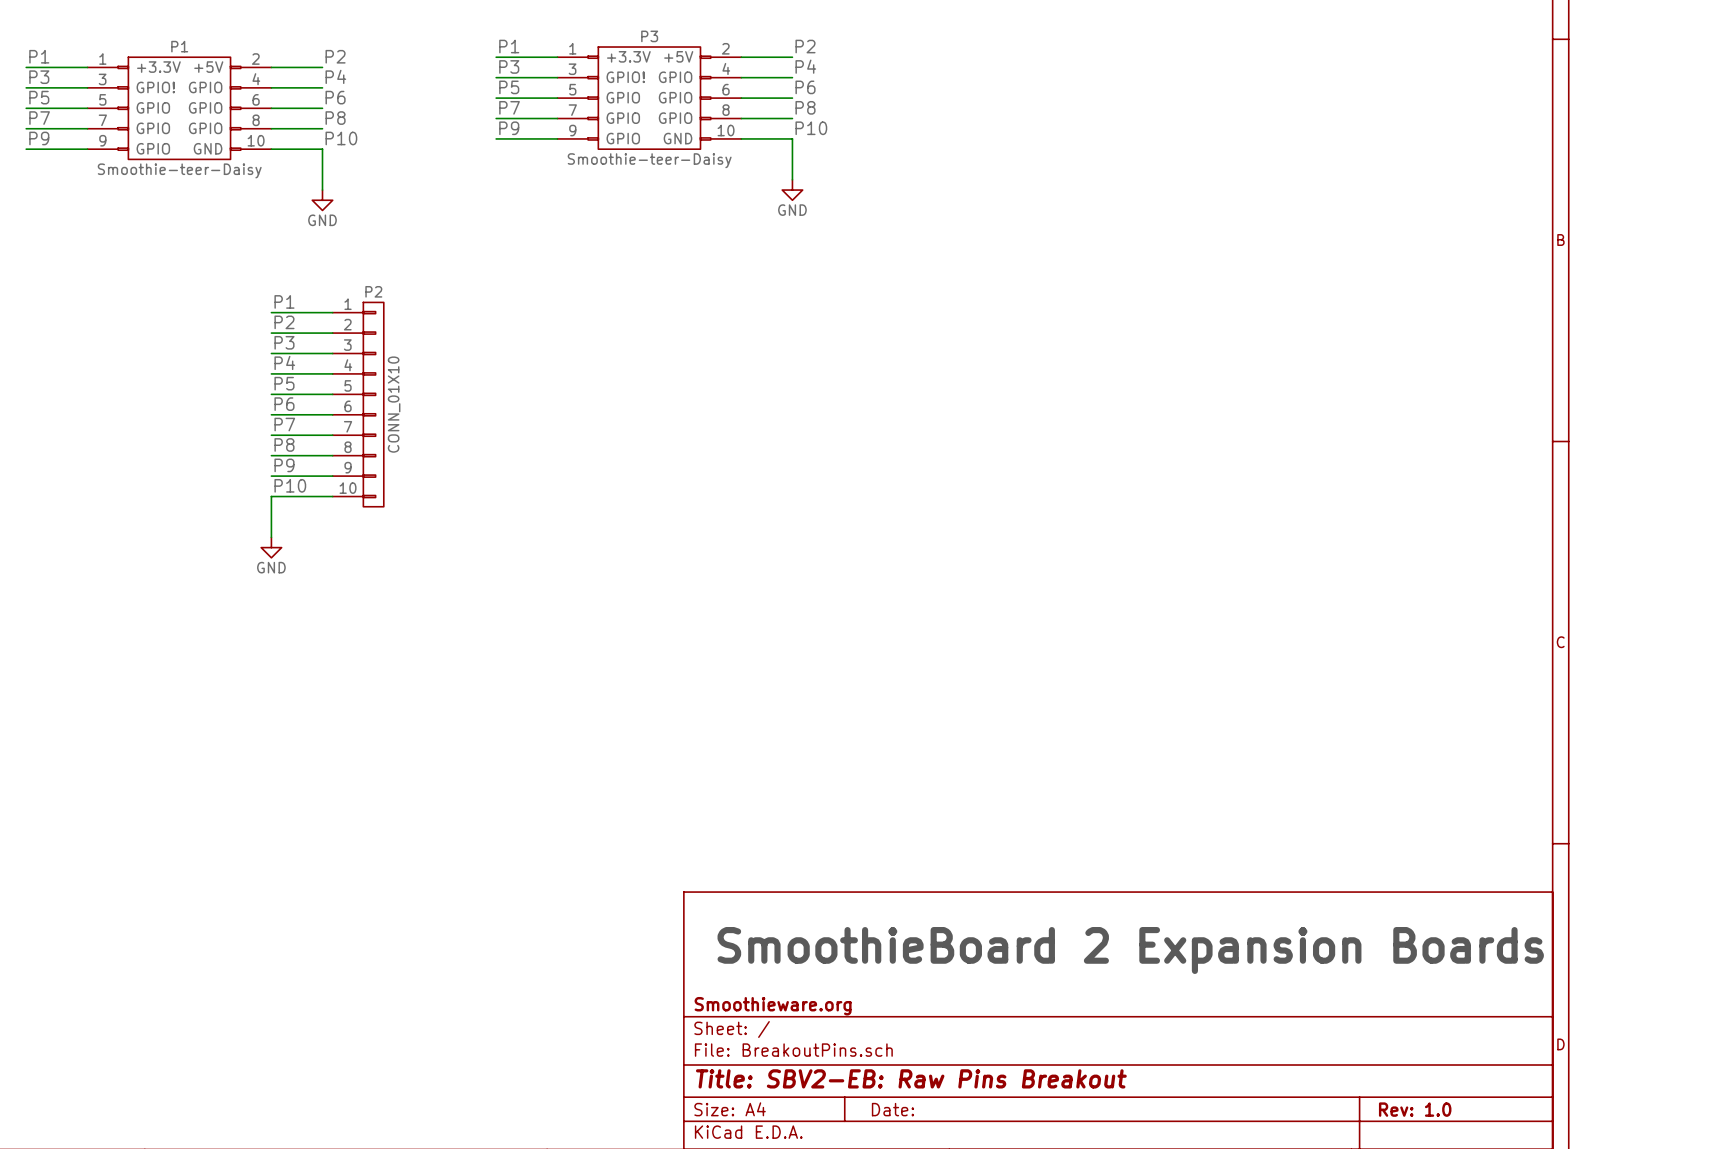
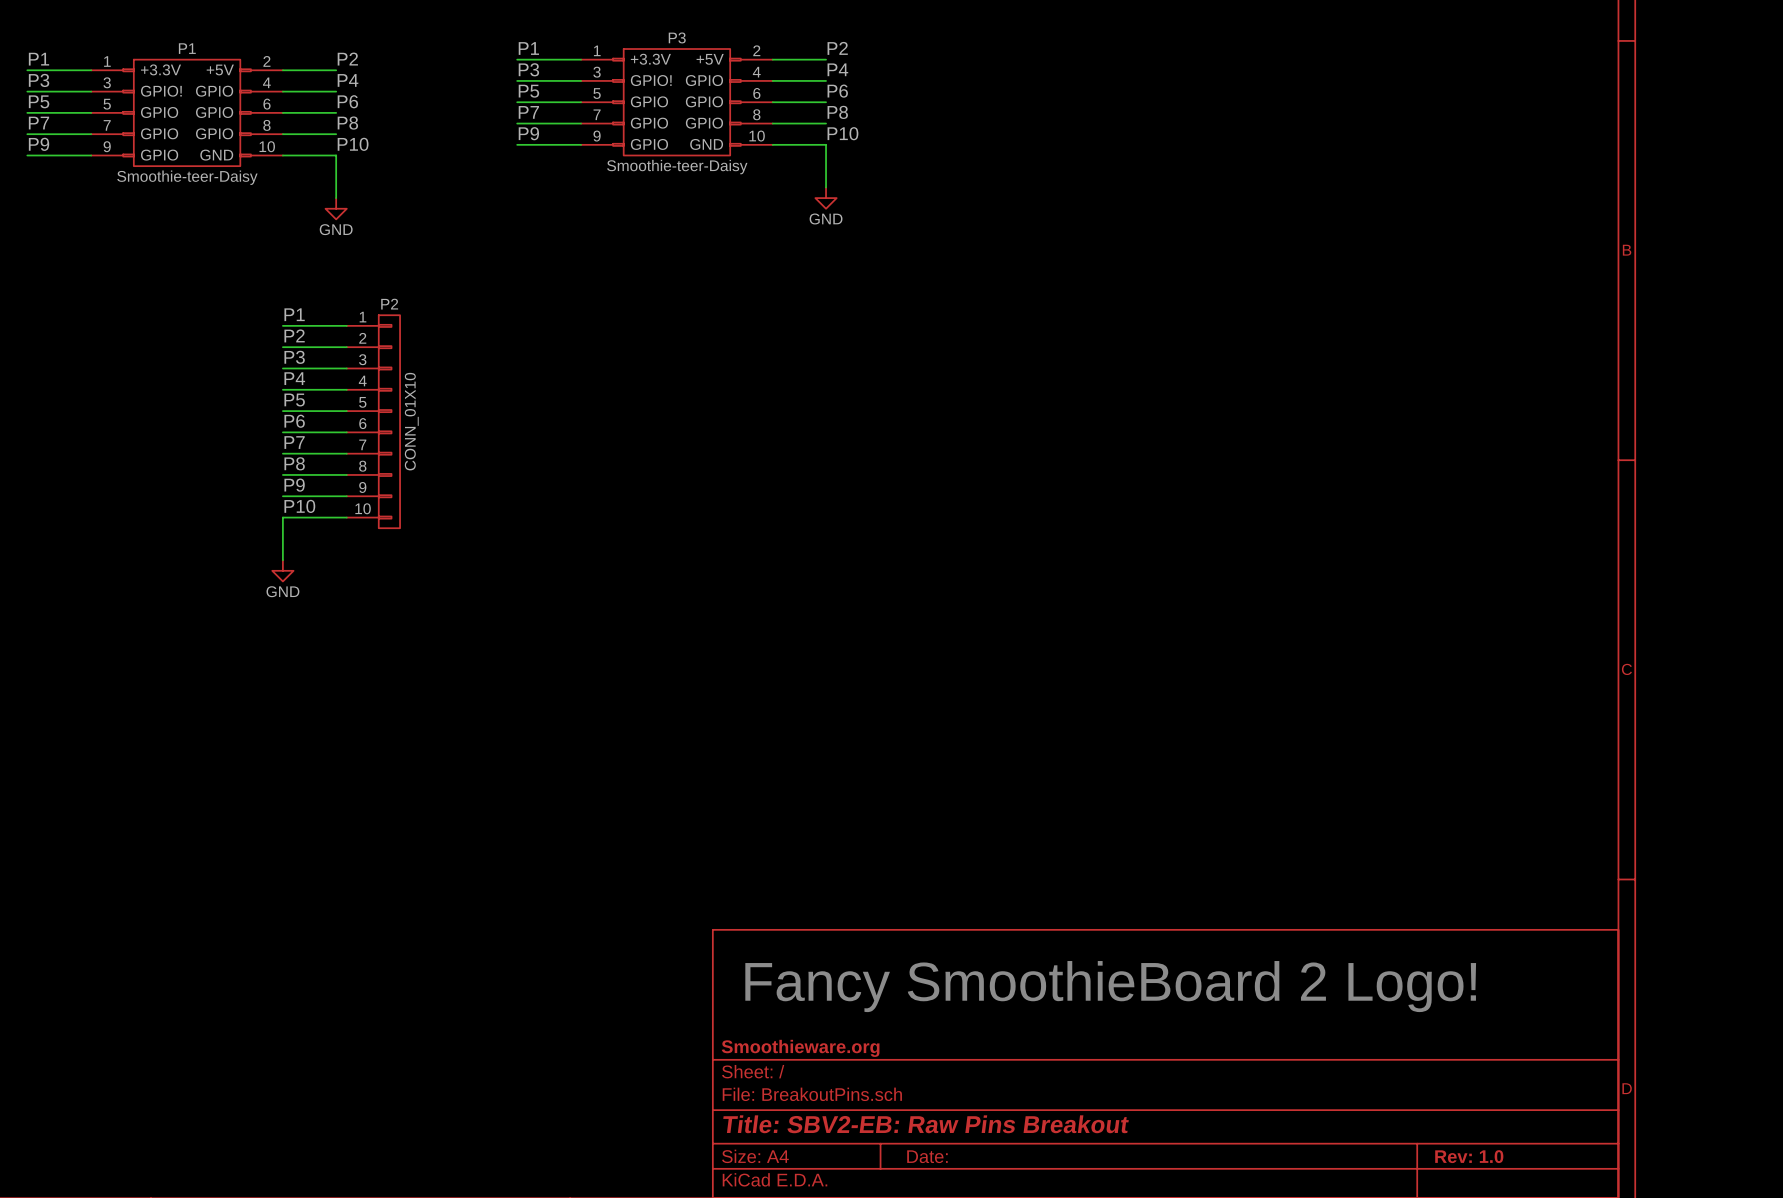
text: SmoothieBoard 2 Expansion Boards (1130, 950) -> Fancy SmoothieBoard 2 Logo! (1110, 986)

